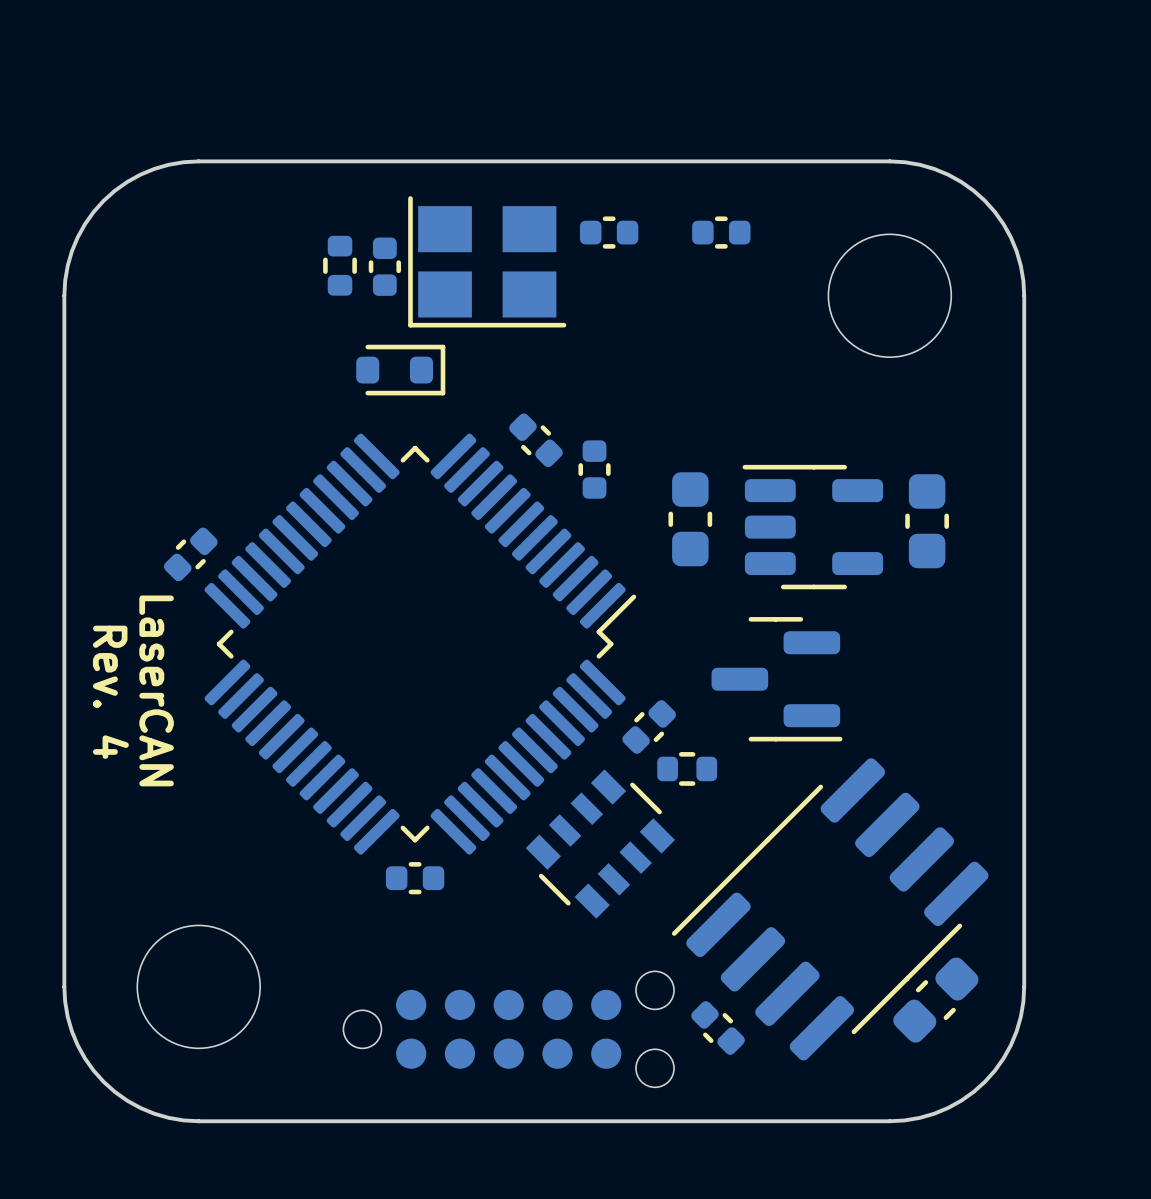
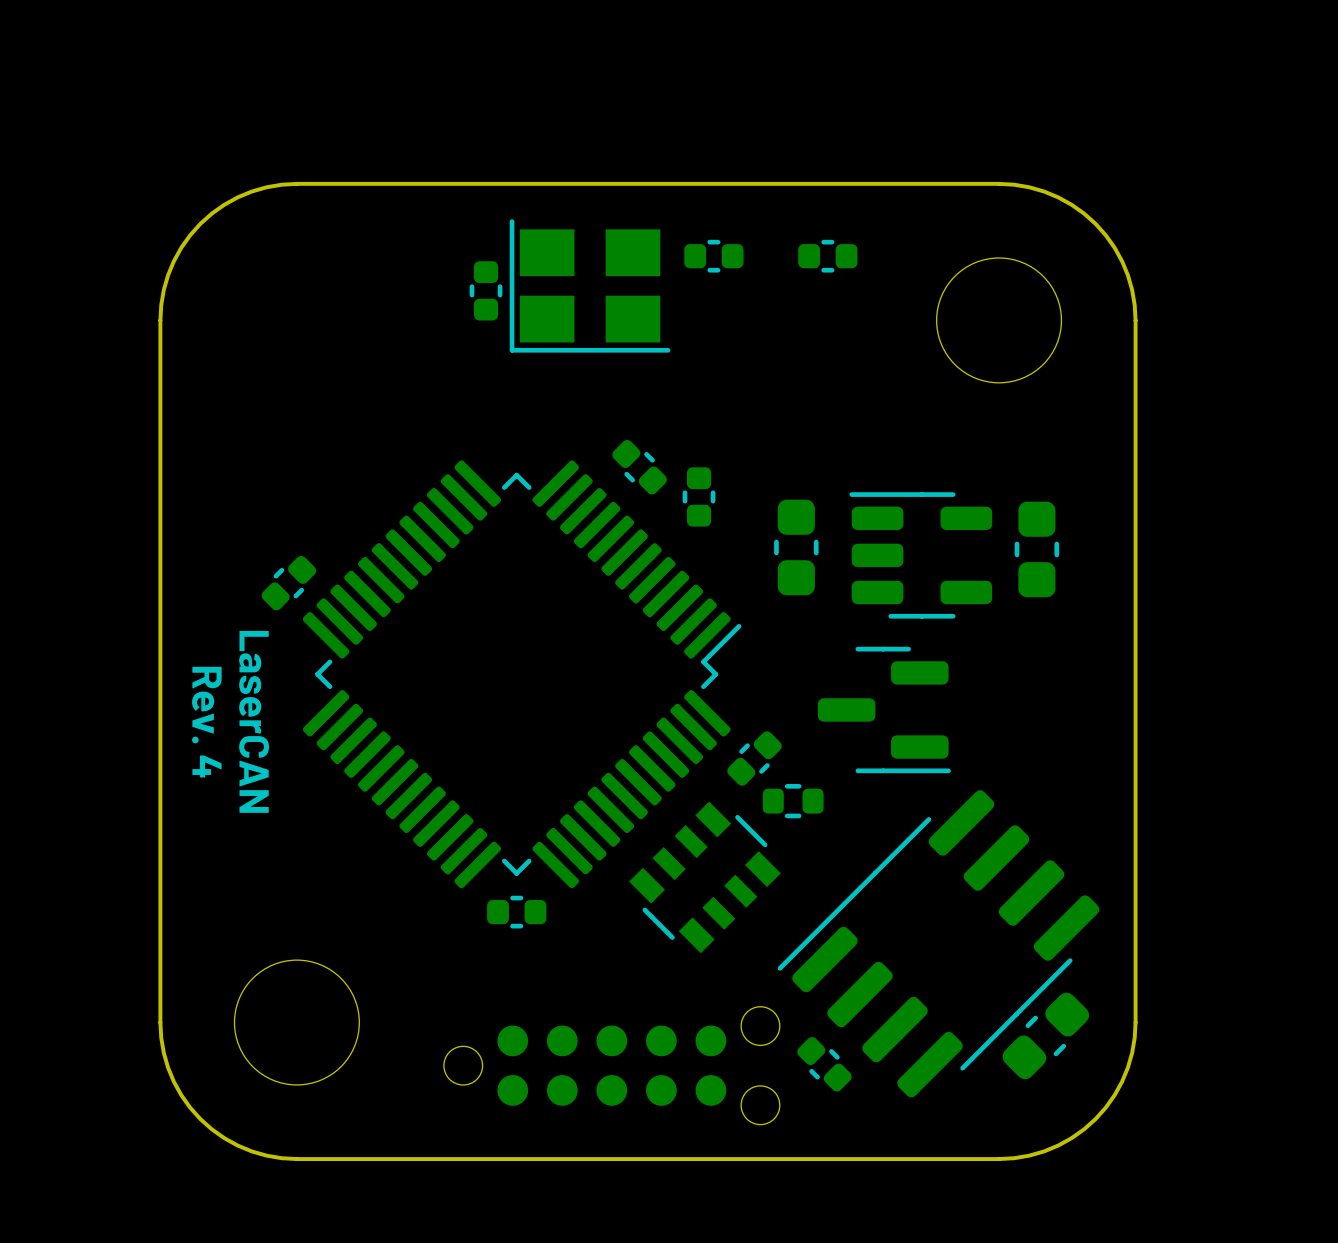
part: (340, 265) -> none
part: (400, 370) -> none

